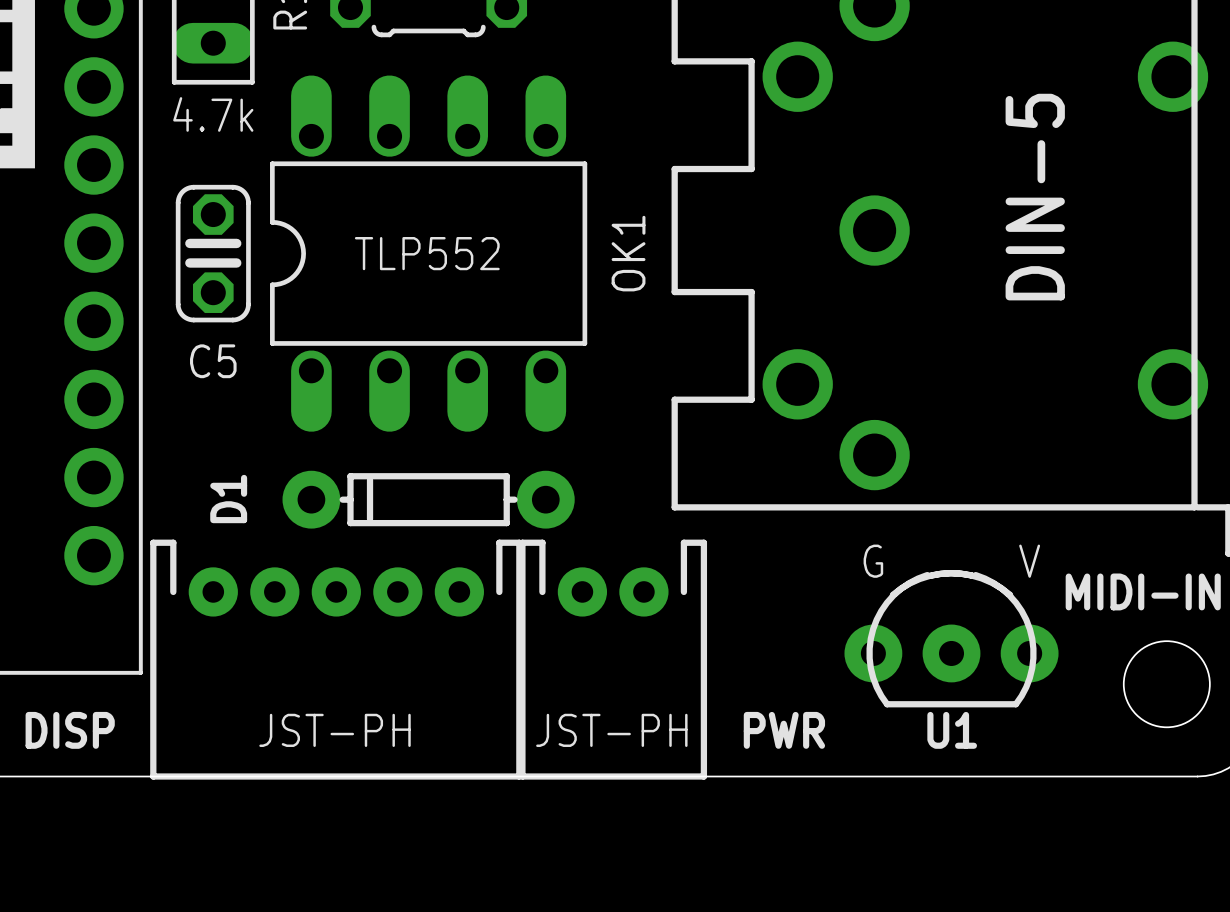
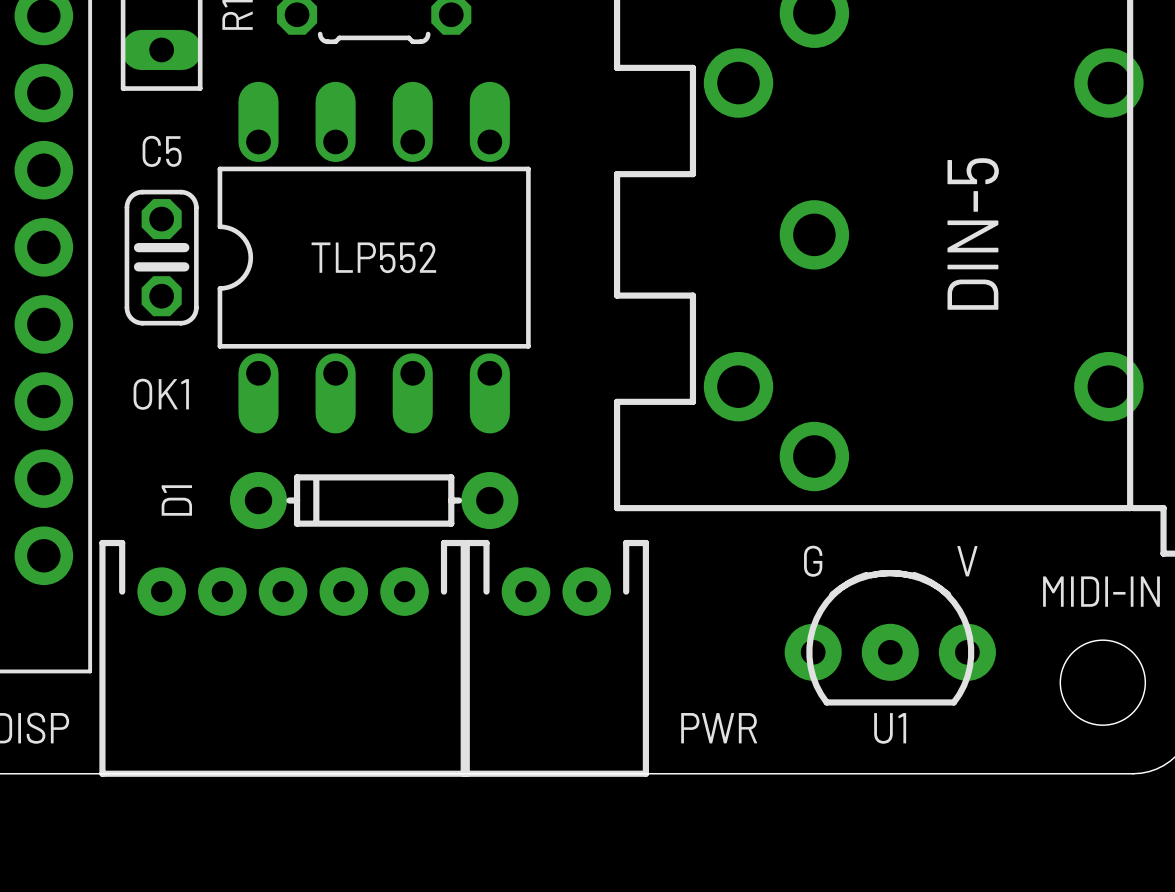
text: 4.7k (213, 114) -> none
OK1 name rotation: 0° (628, 253) -> 90° clockwise (161, 394)
OK1 name position: OK1 (628, 253) -> OK1 (161, 394)
C5 name position: C5 (213, 361) -> C5 (162, 151)
text: JST-PH (335, 730) -> none
text: JST-PH (611, 730) -> none

